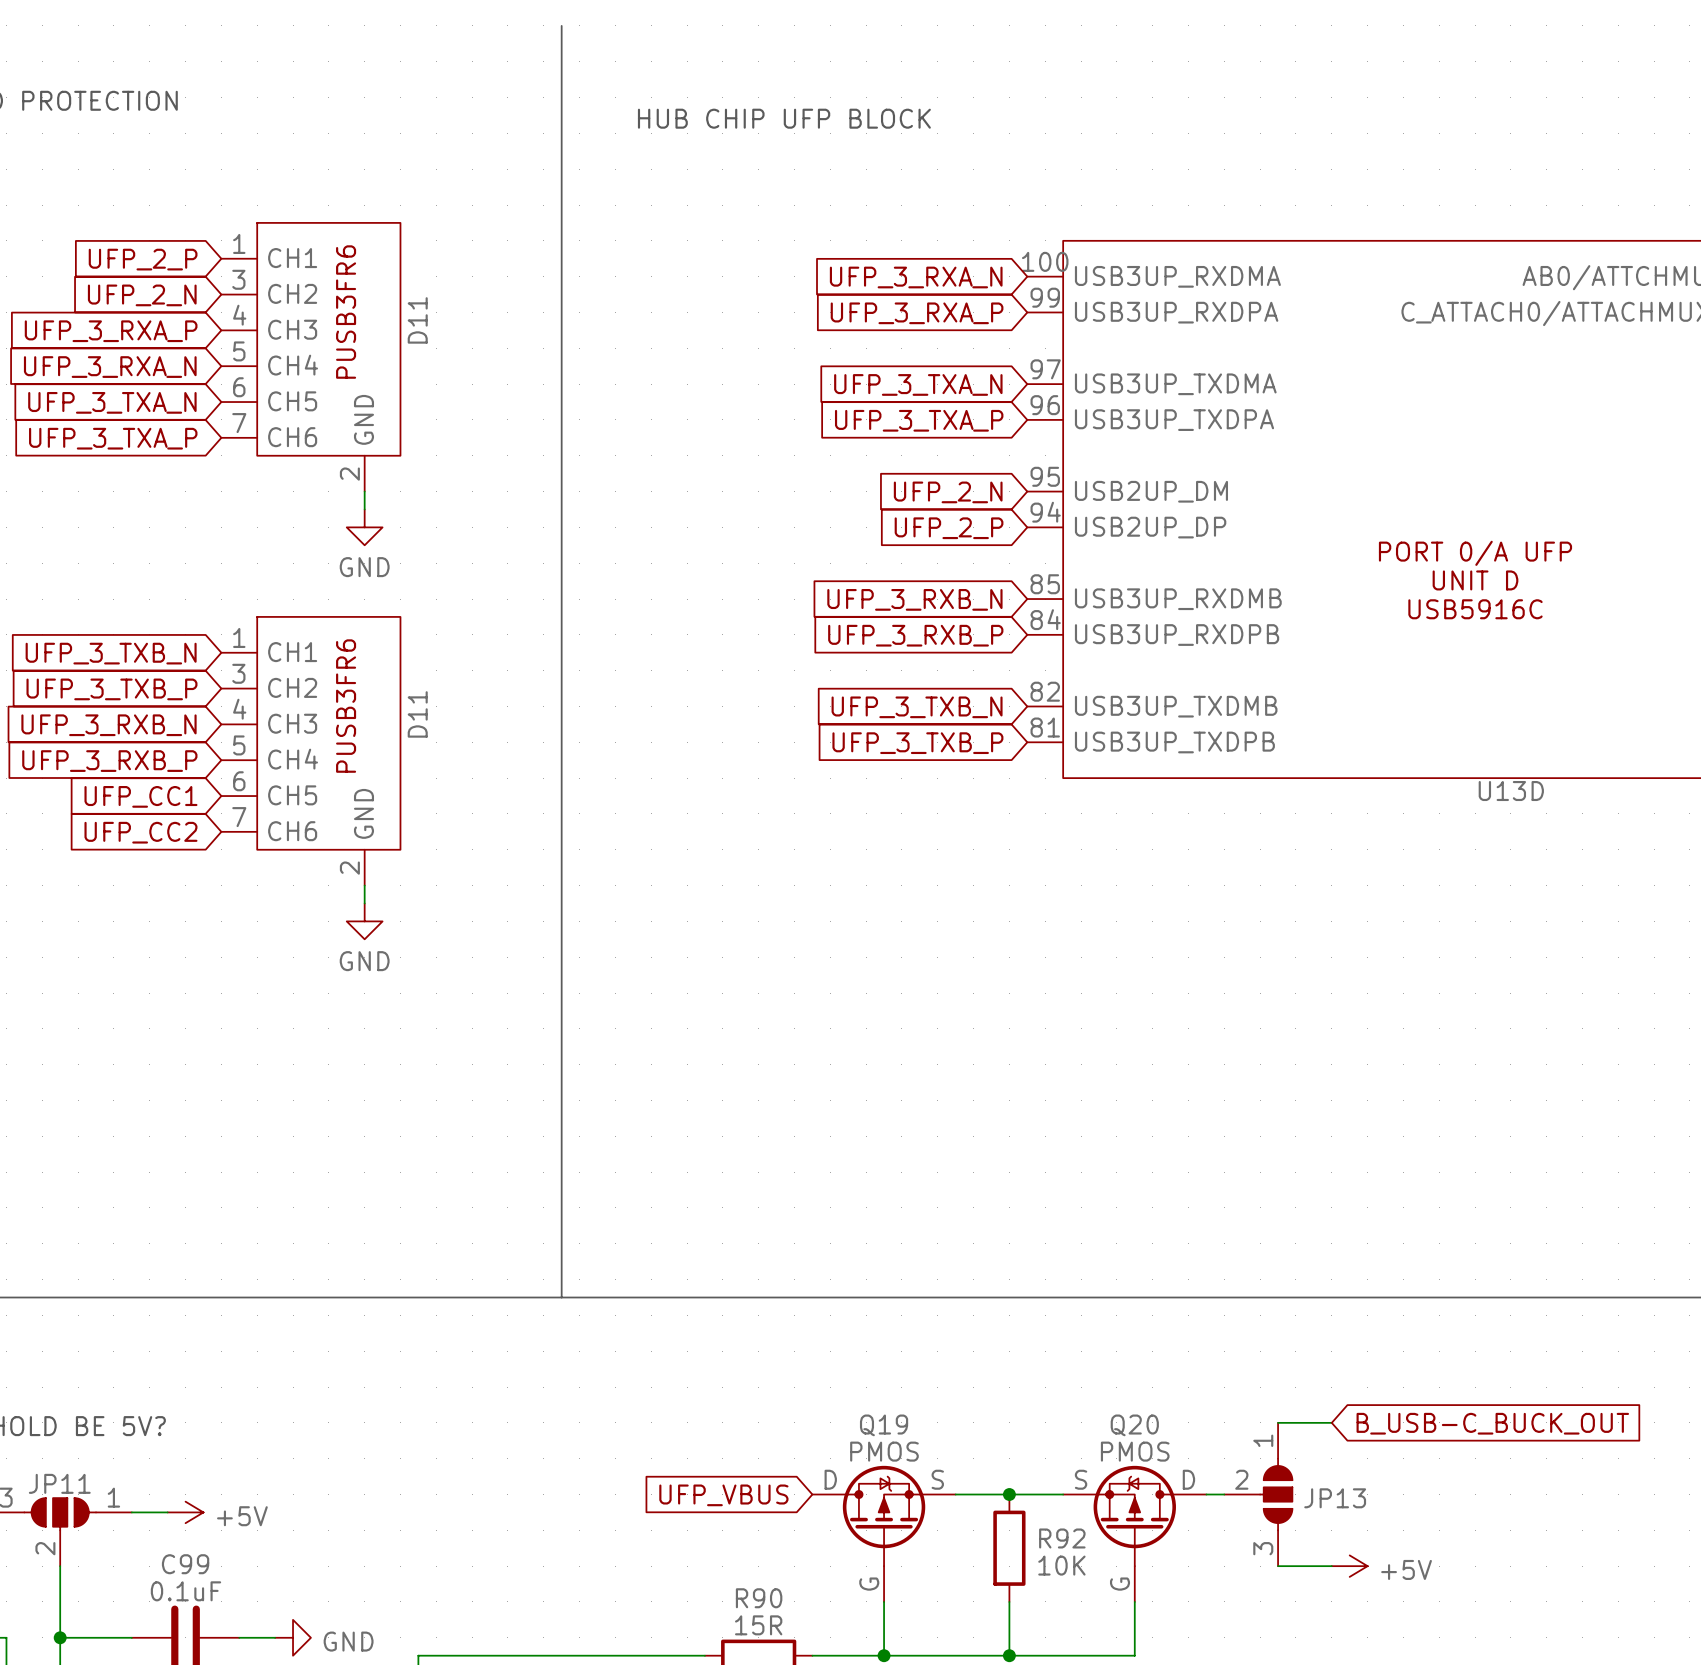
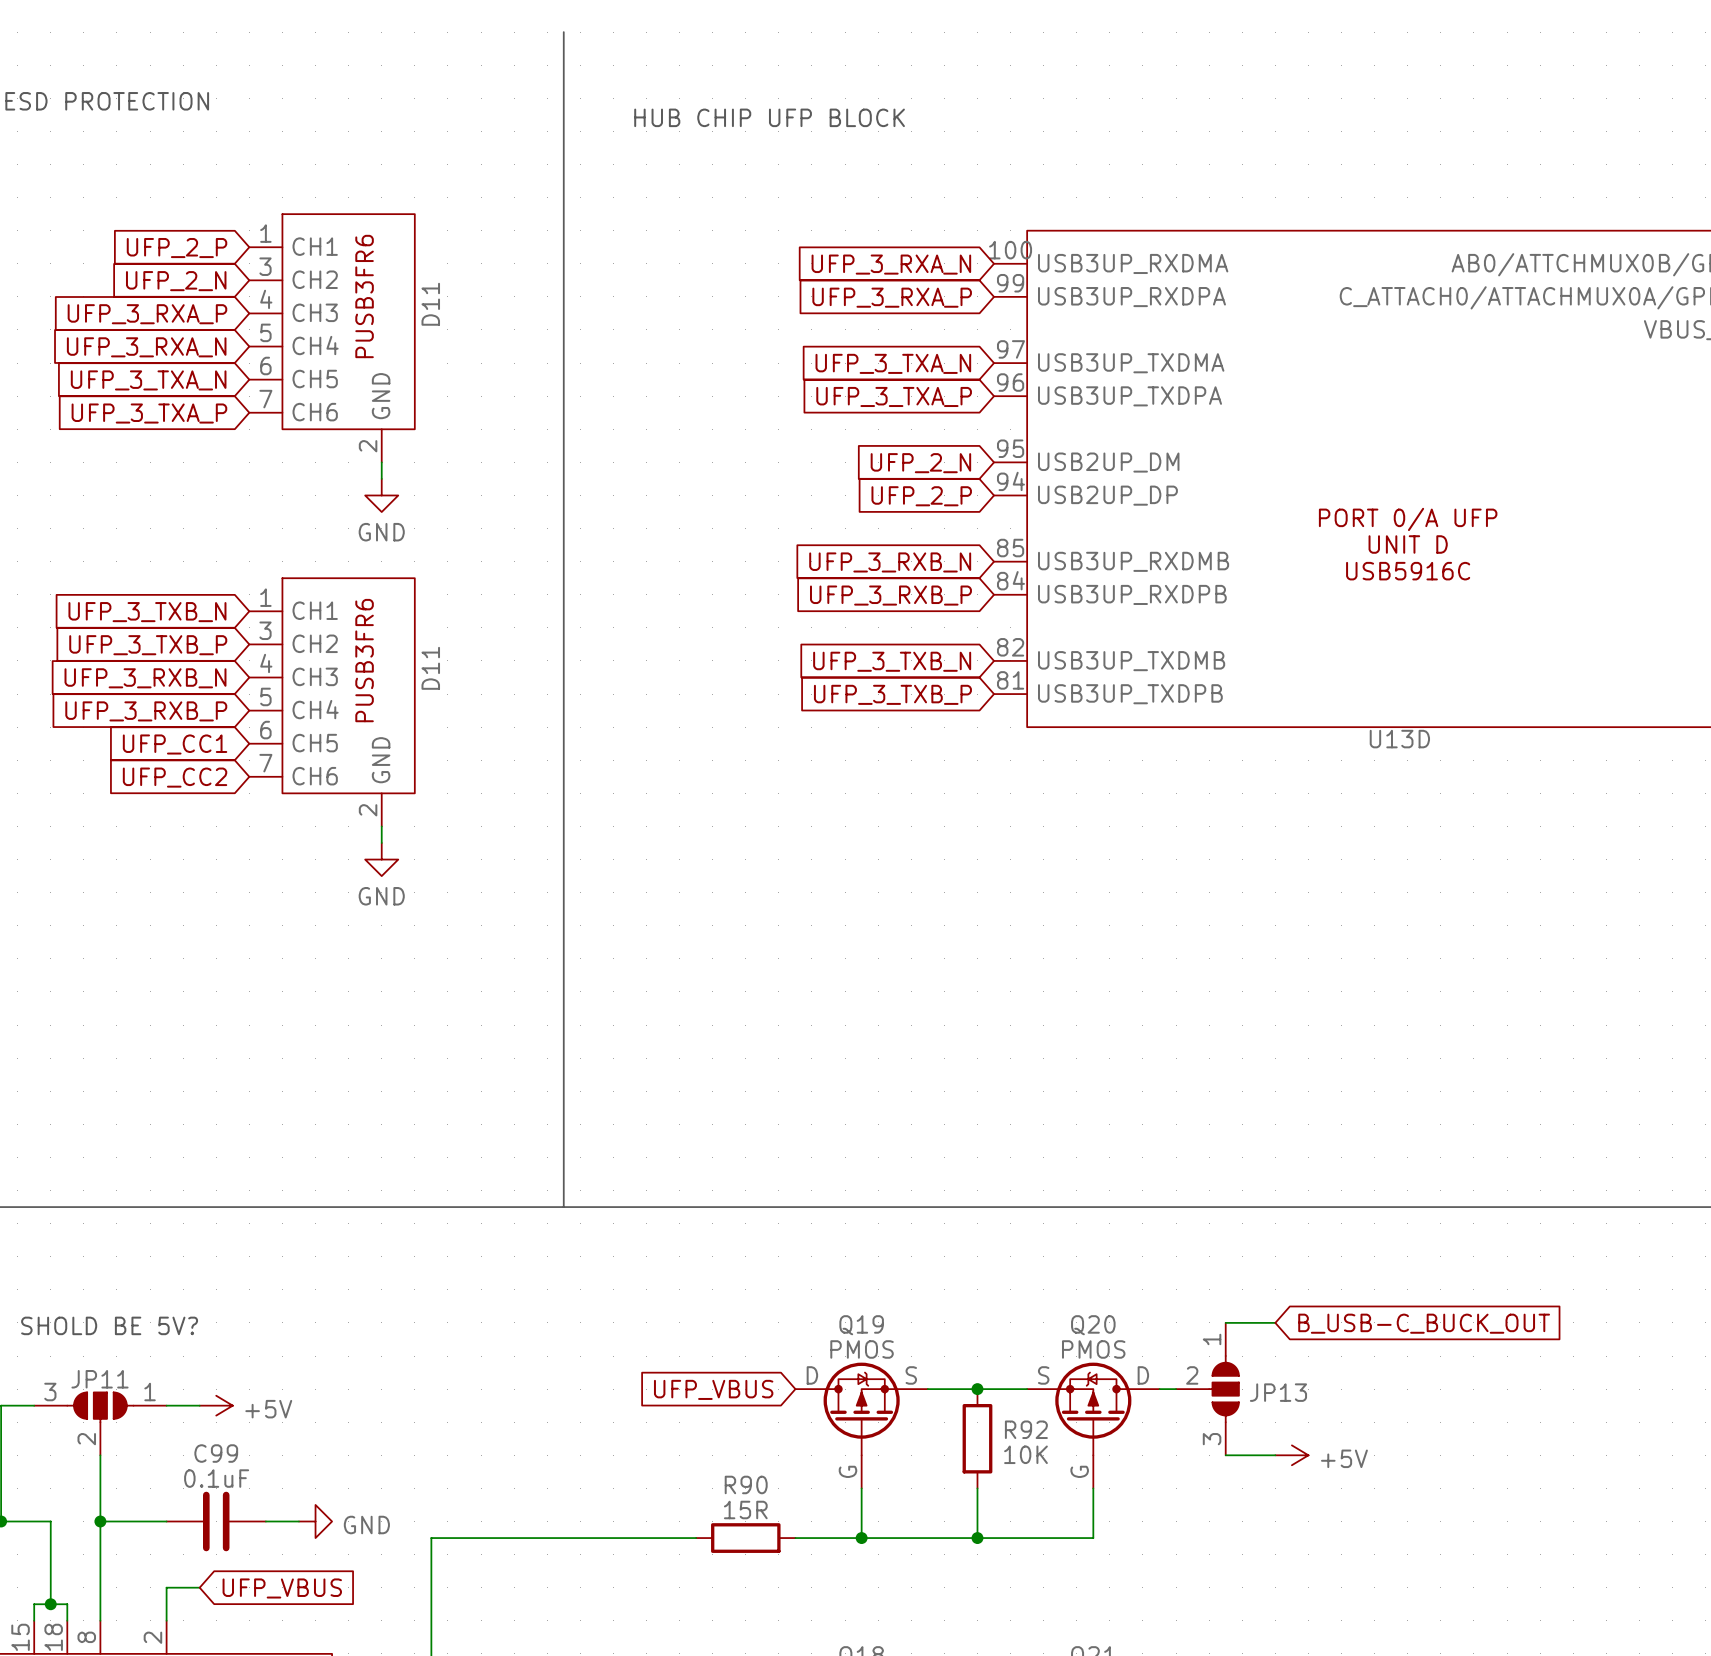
U13D name position: U13D (1511, 791) -> U13D (1399, 739)

